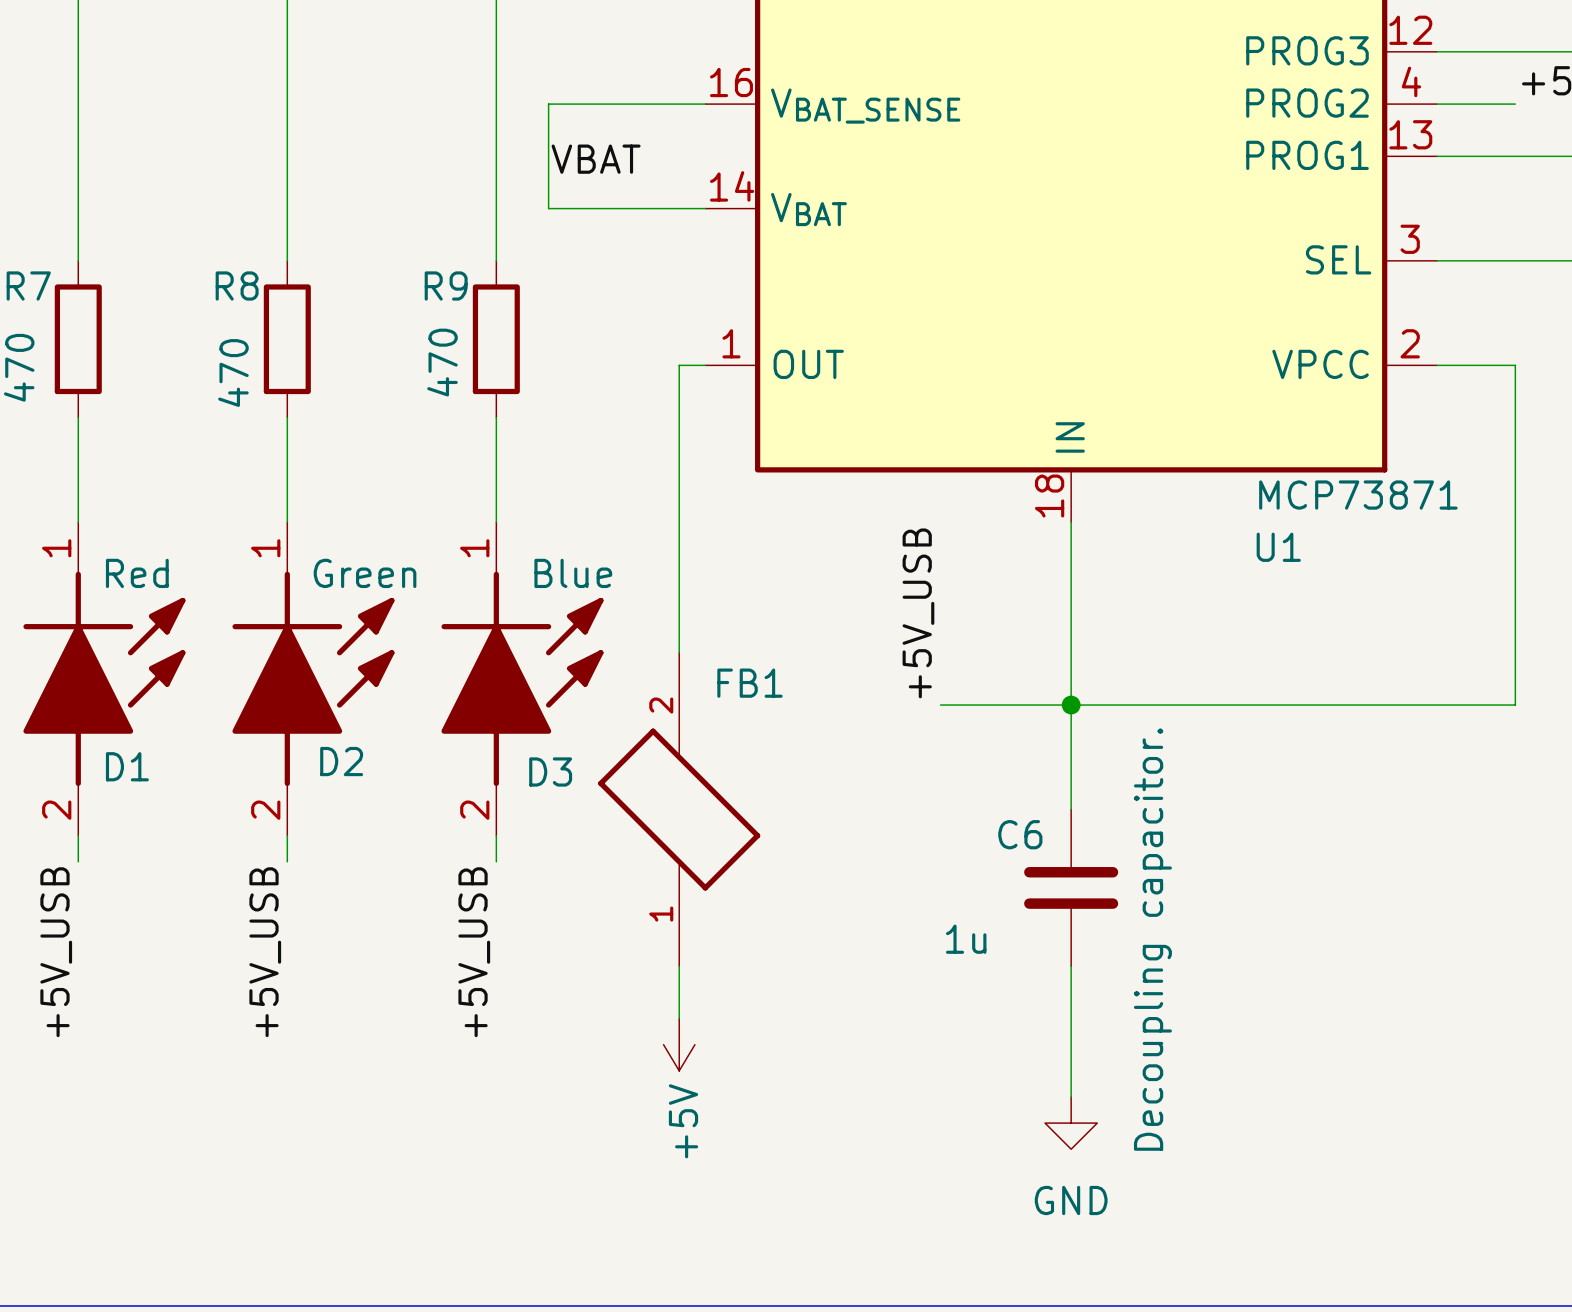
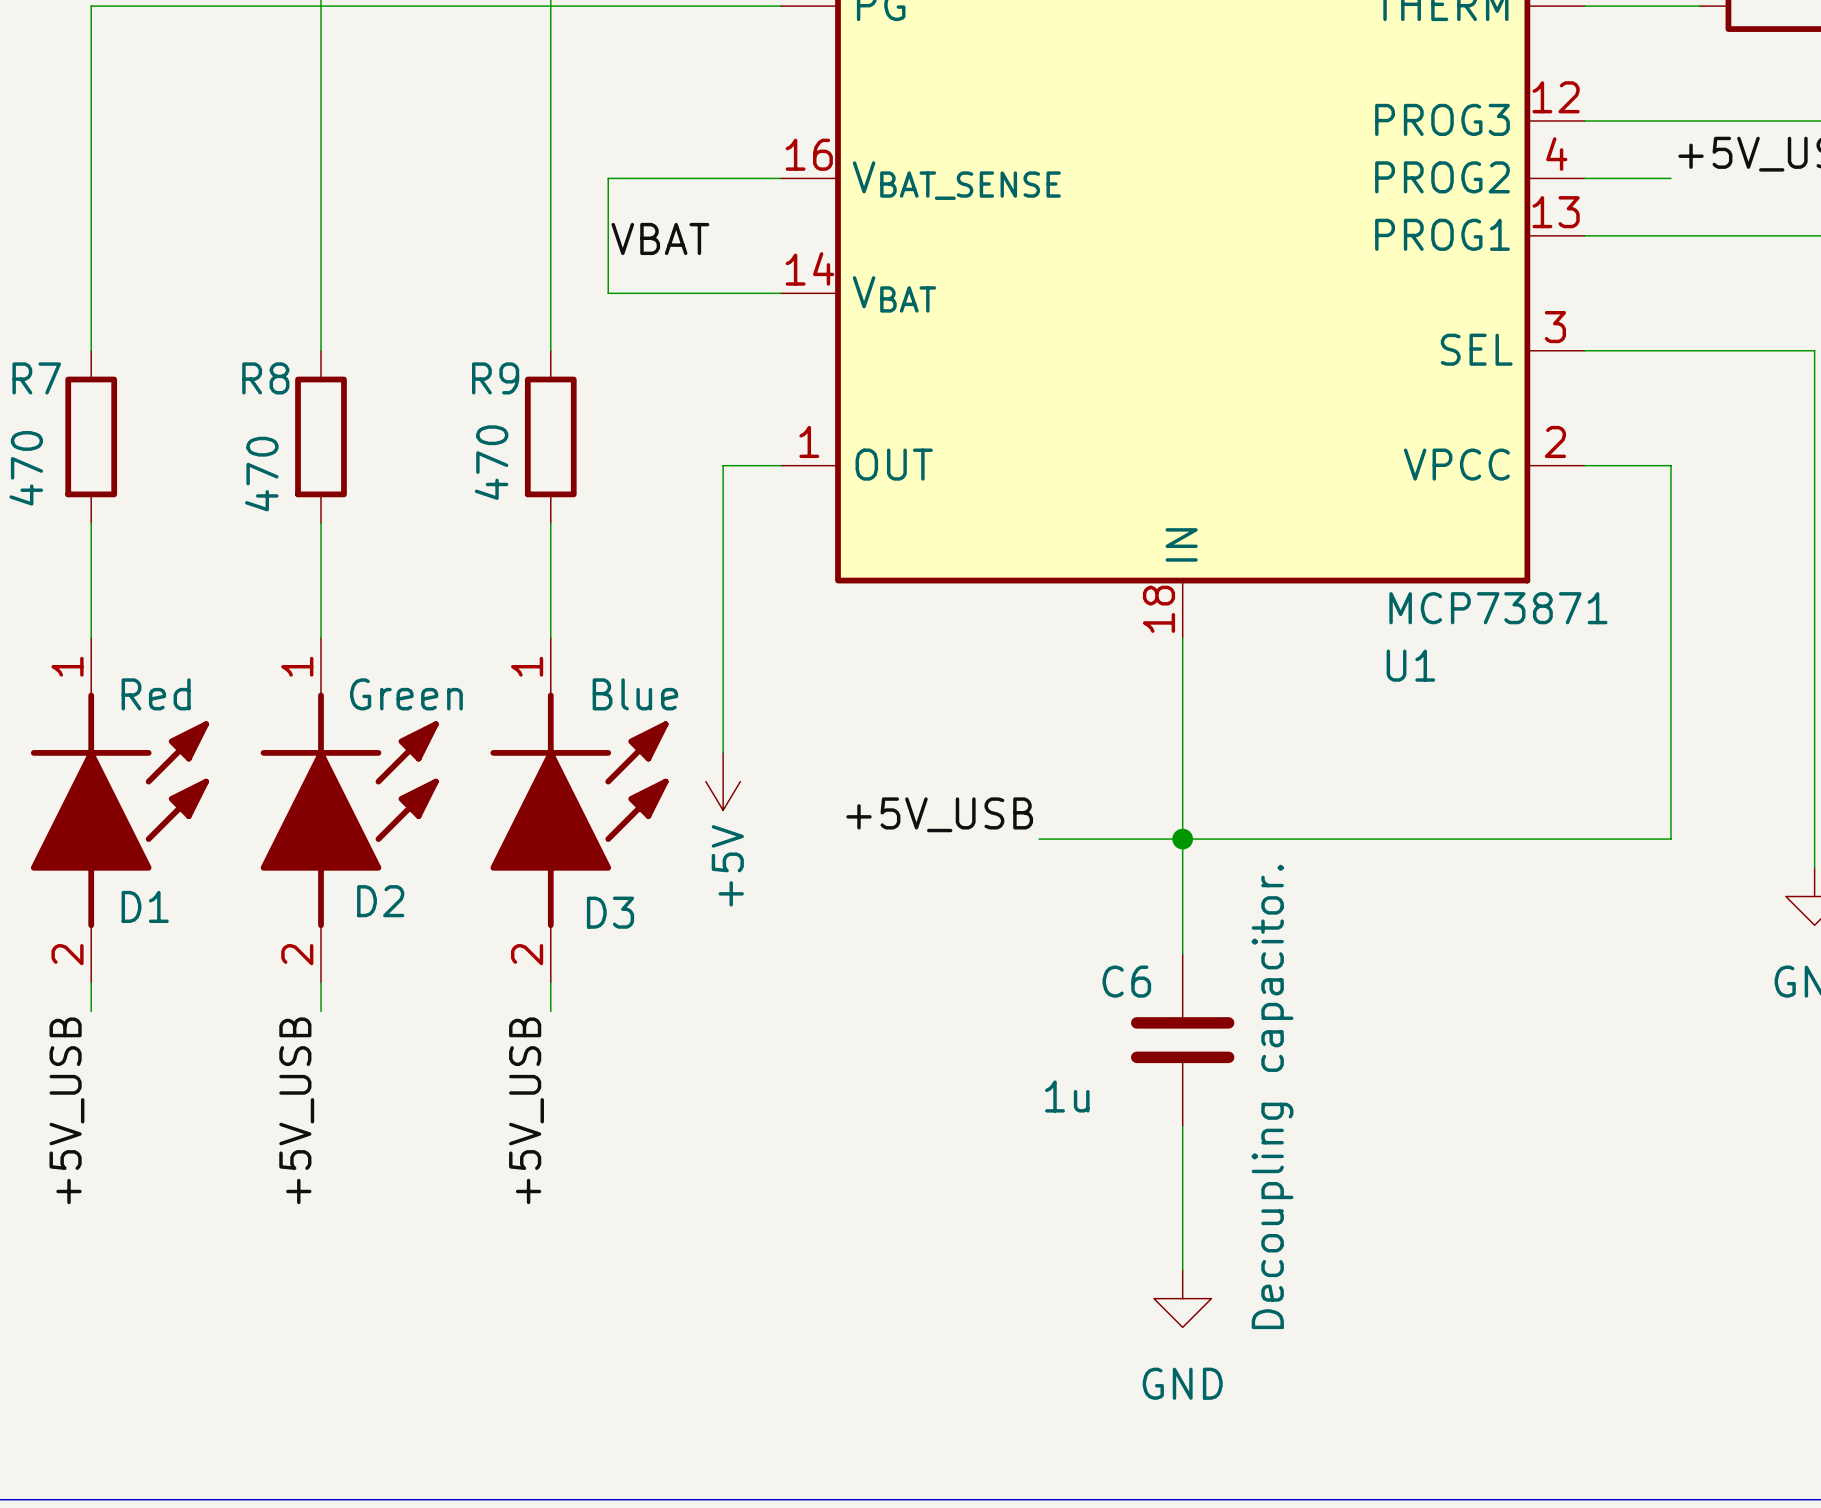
wire: (679, 365) (679, 652) -> (751, 465) (723, 465) (723, 752)
label rotation: 0° (918, 613) -> 90° clockwise (939, 814)
FB1: (679, 809) -> none
wire: (679, 966) (679, 1018) -> none
power symbol position: +5V (679, 1044) -> +5V (723, 781)

